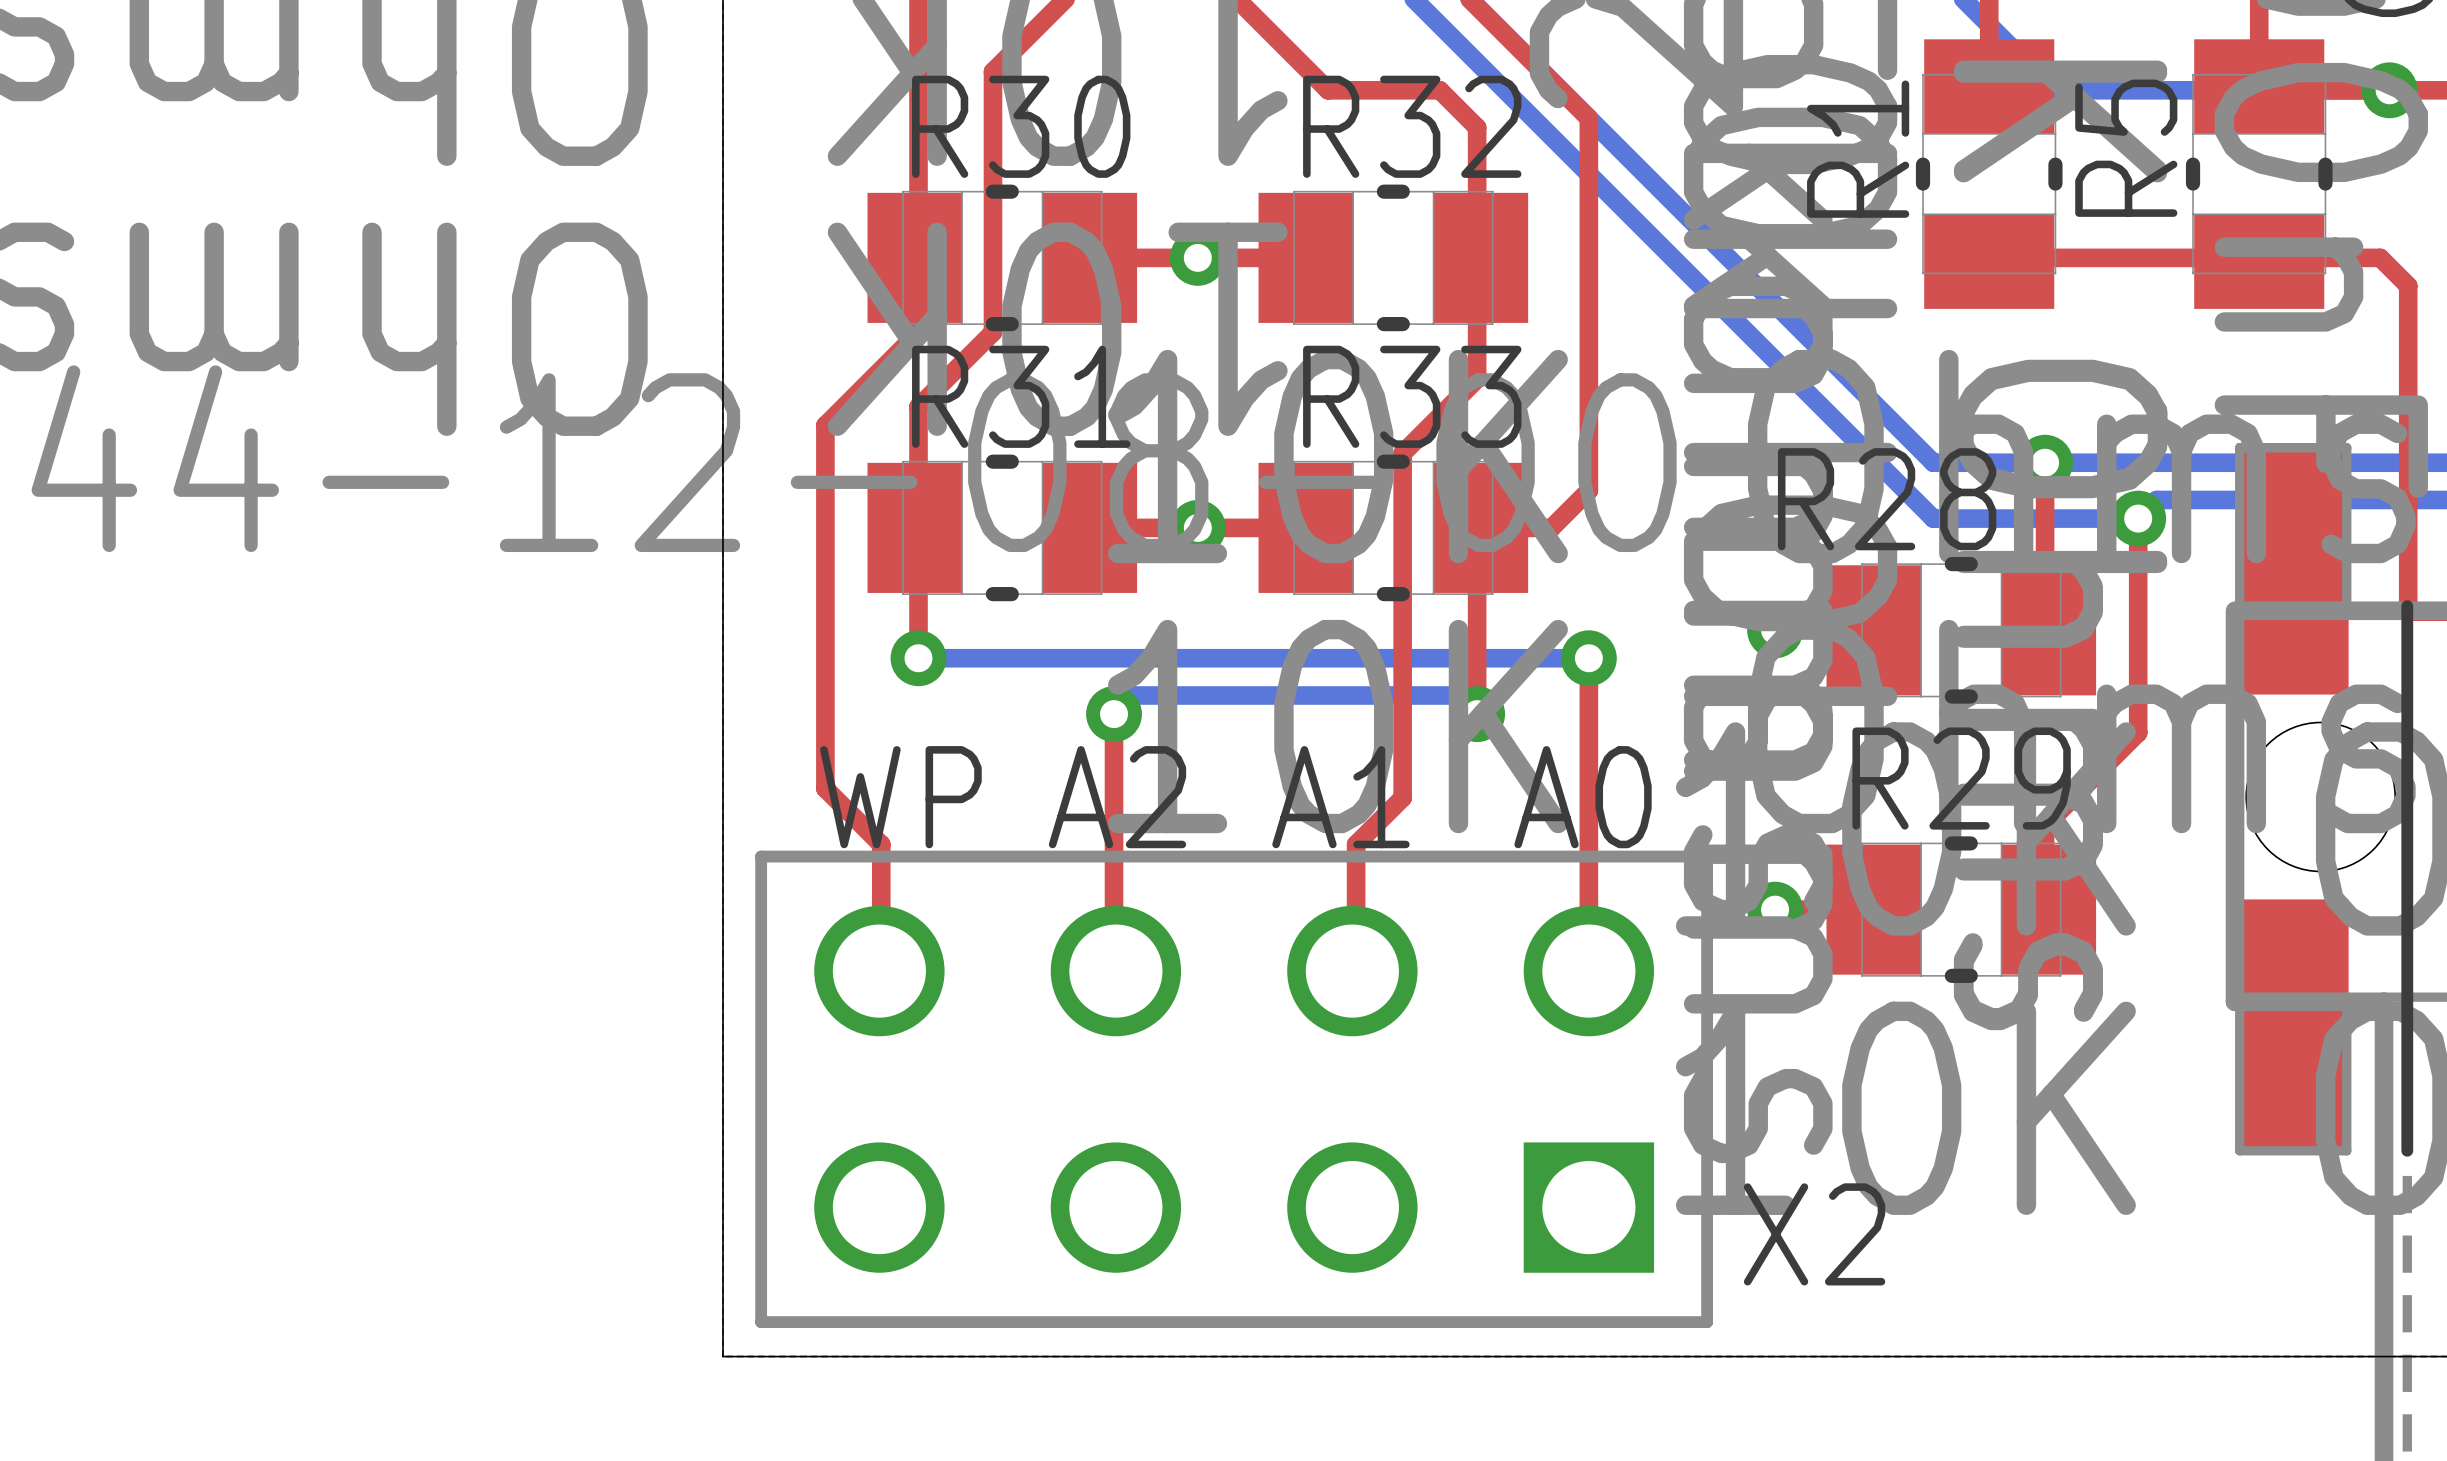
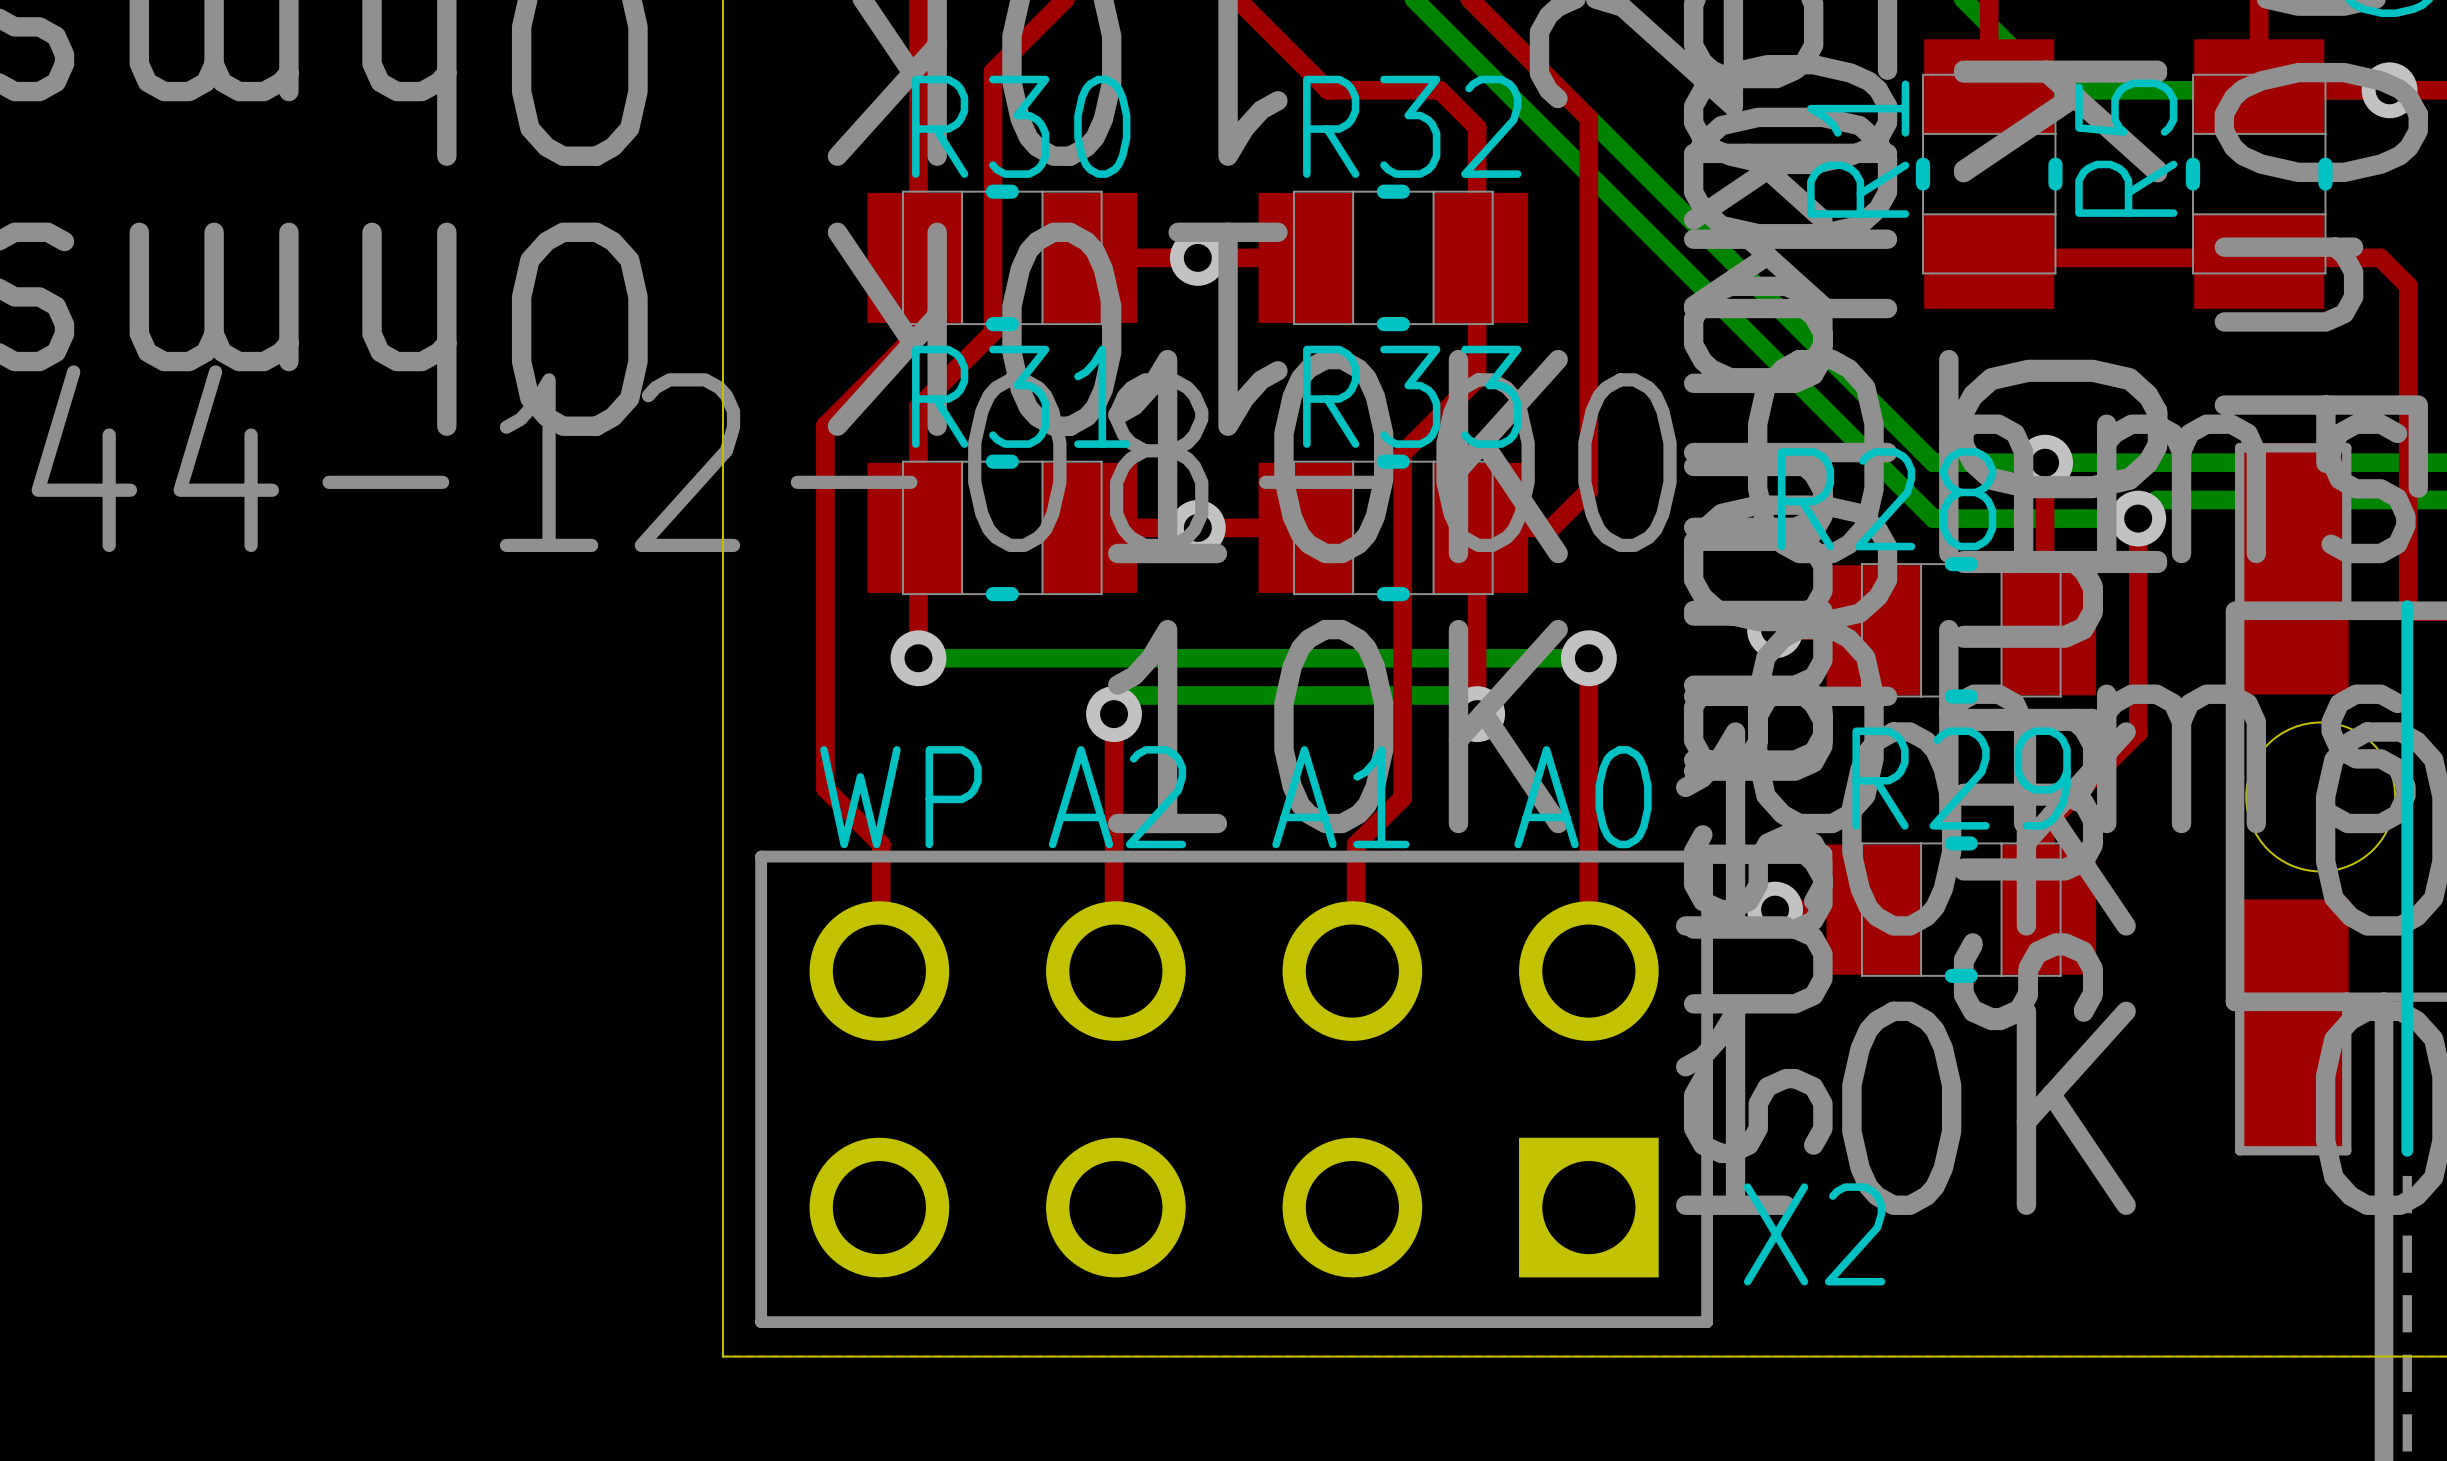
X2 footprint: [755, 850, 1714, 1329] -> [755, 850, 1714, 1329]

